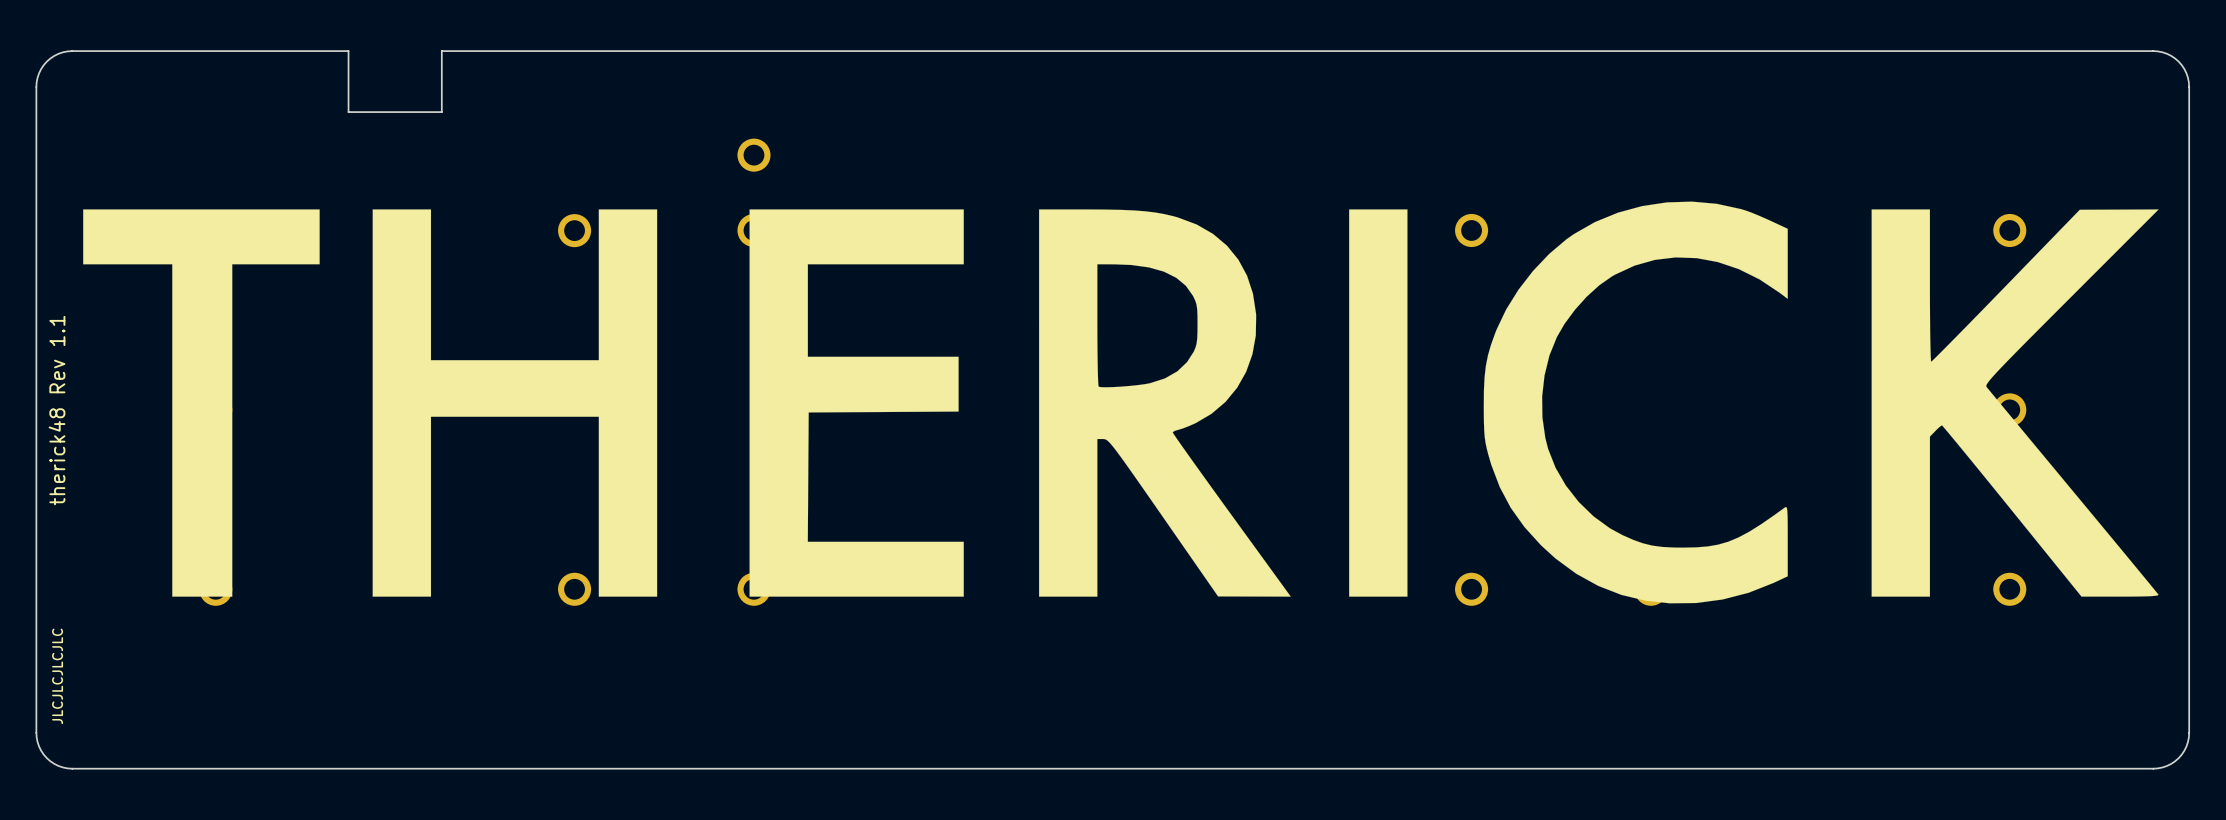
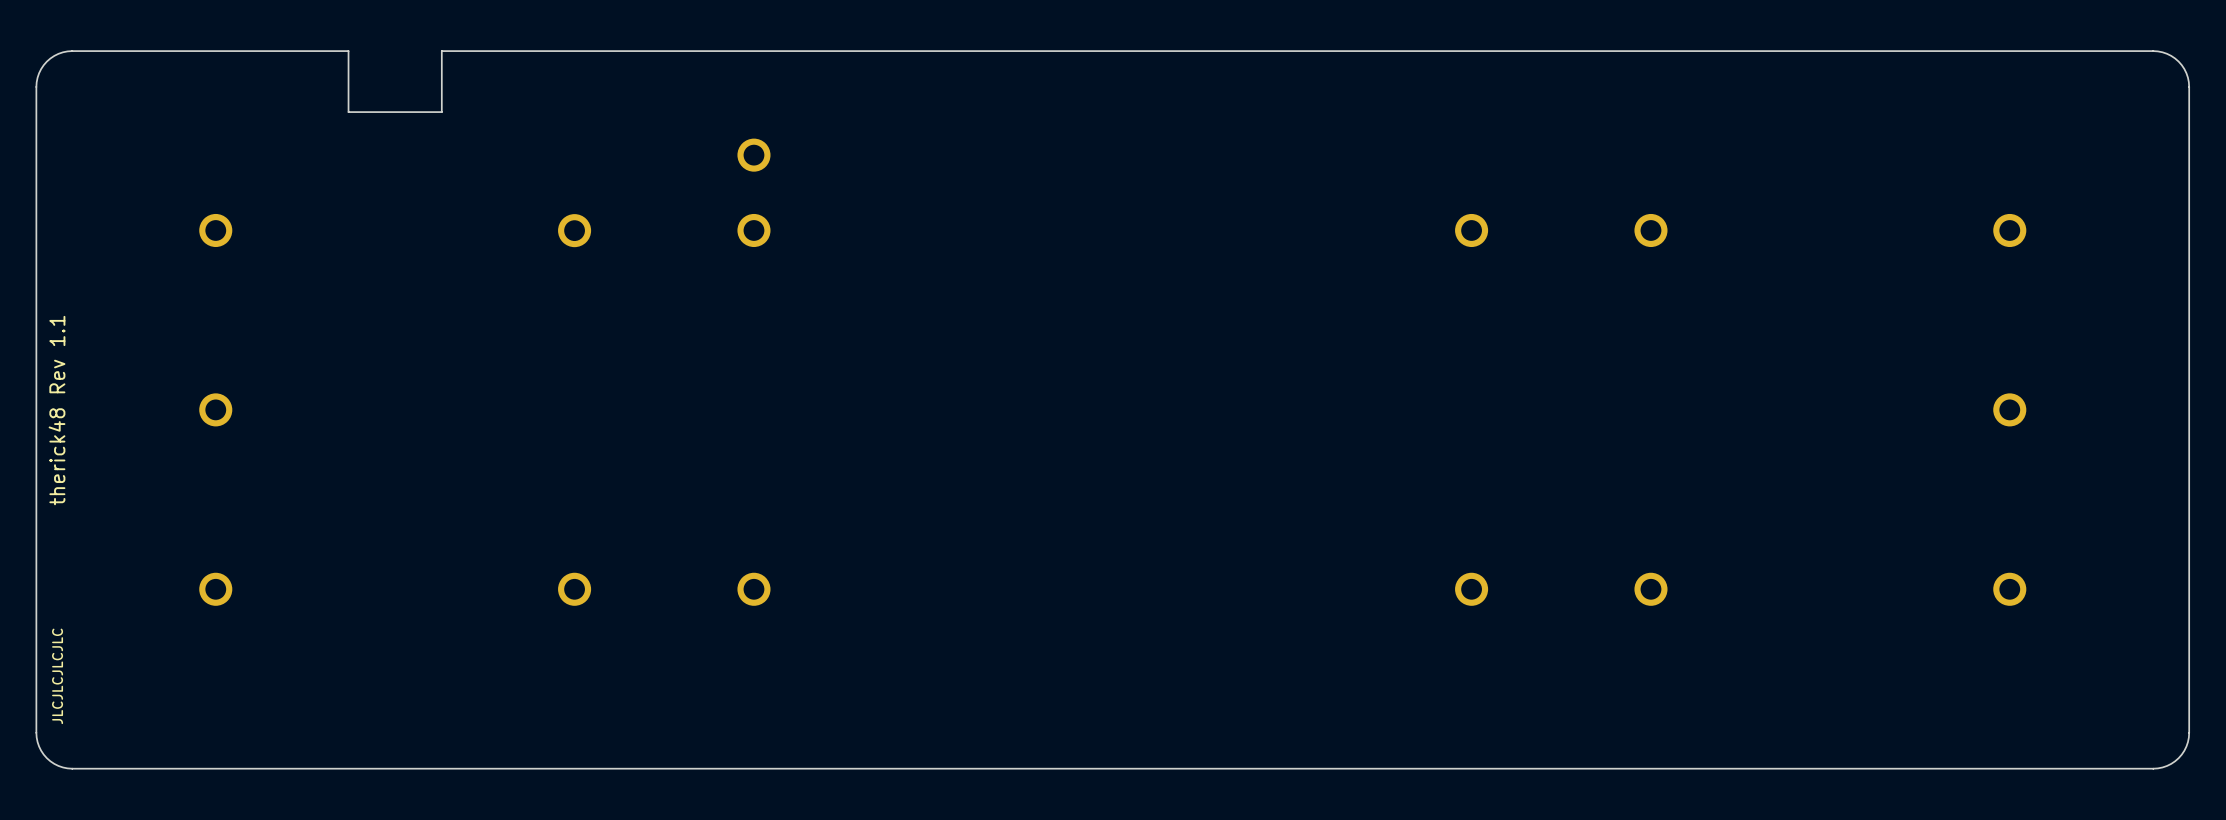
drawing: [83, 201, 2159, 604] -> none

